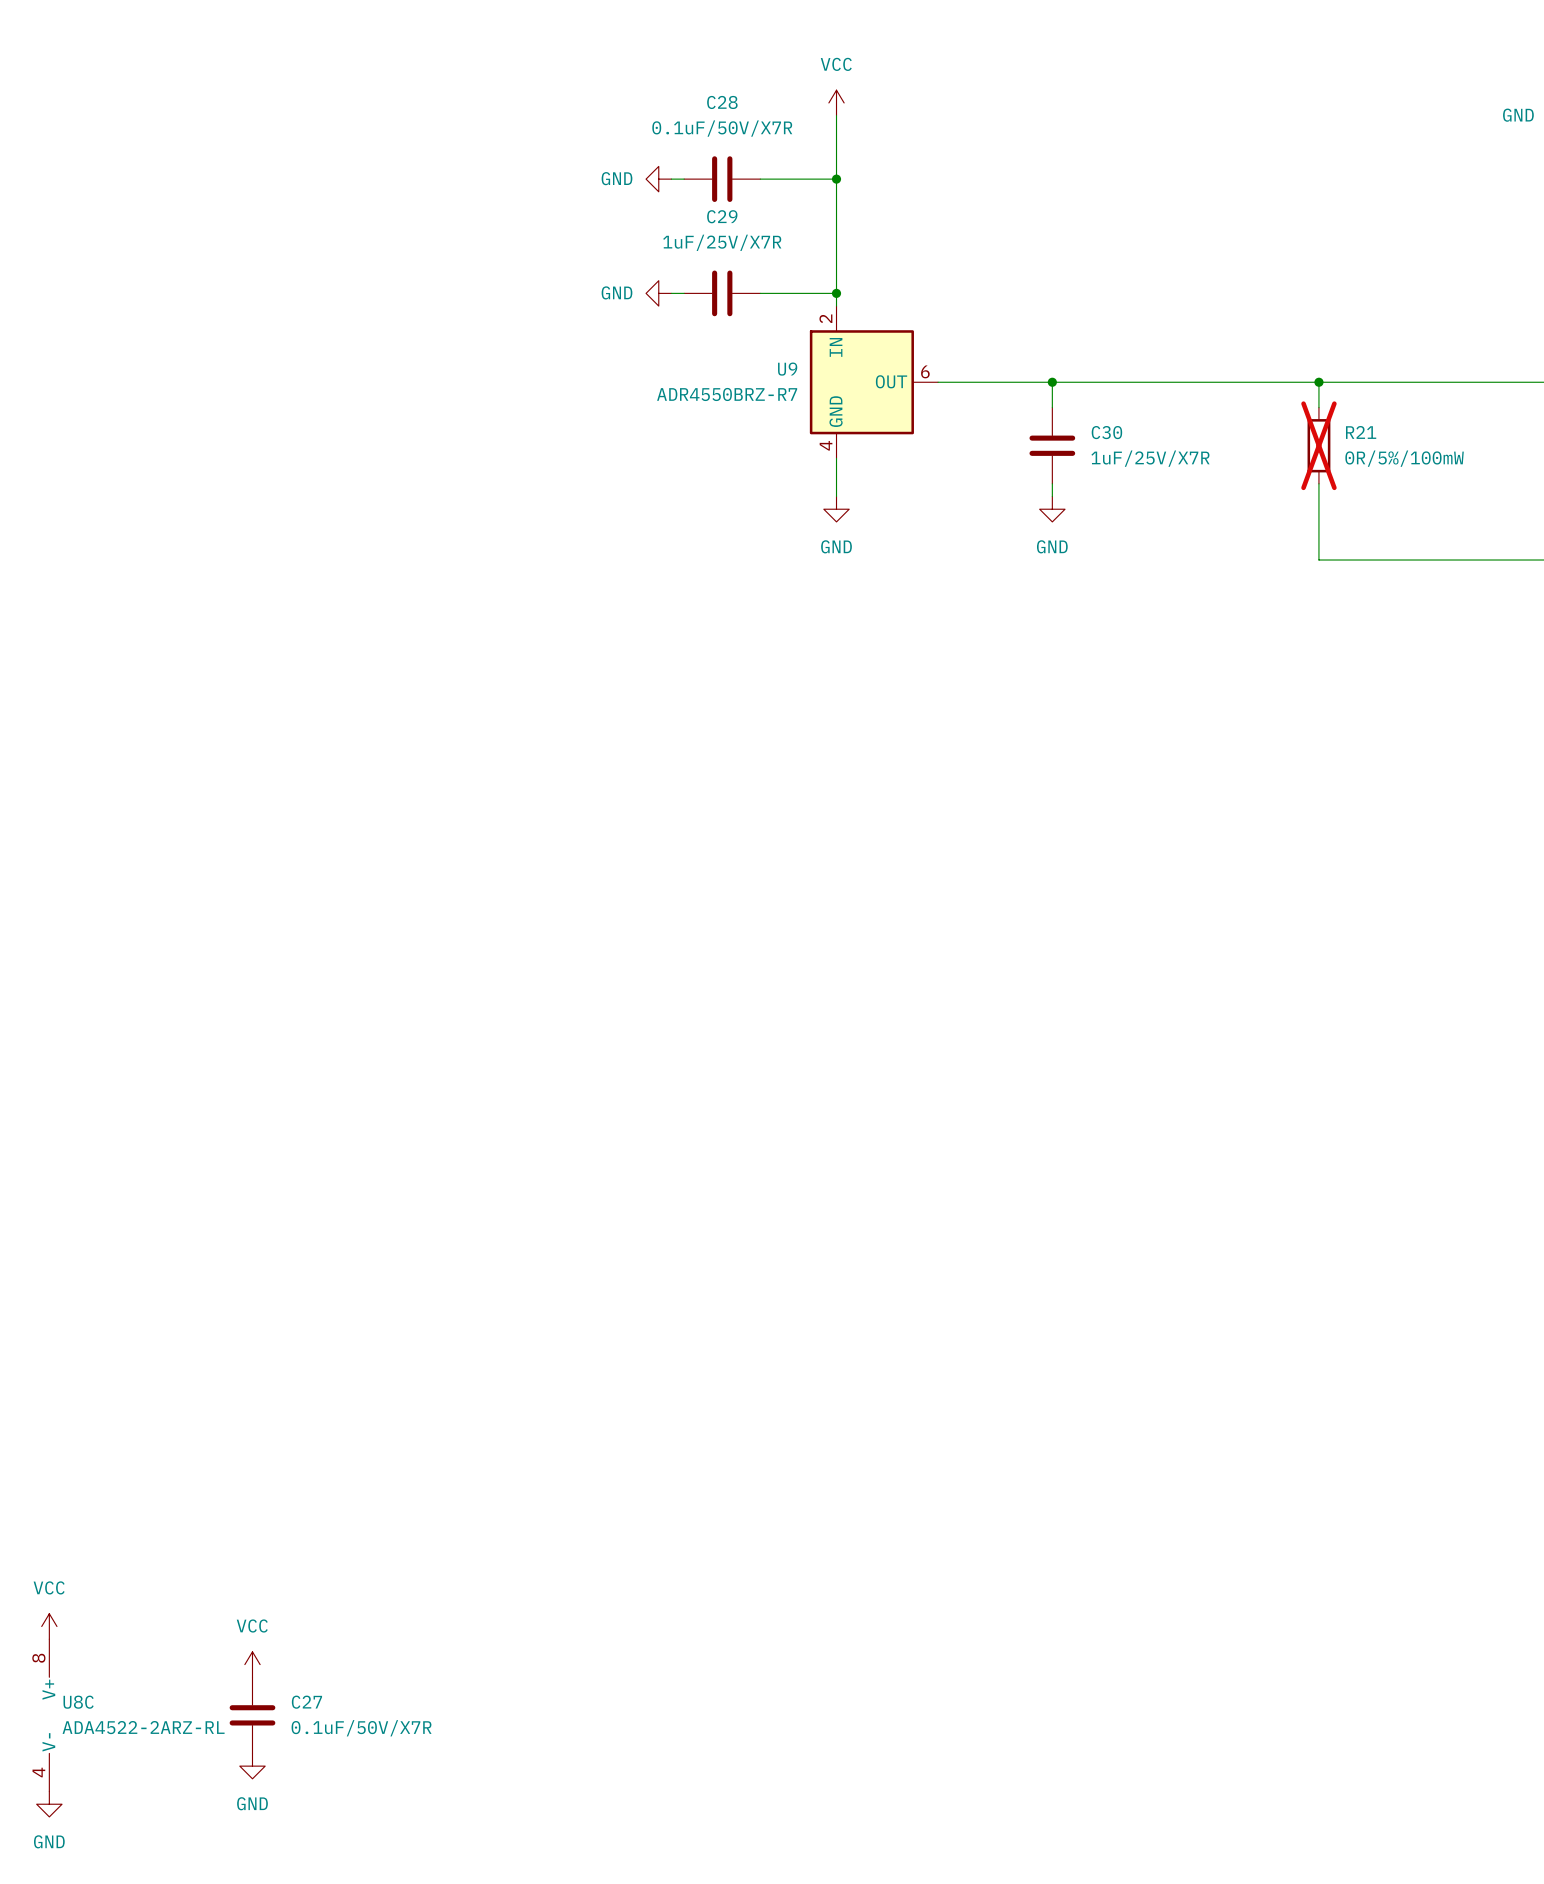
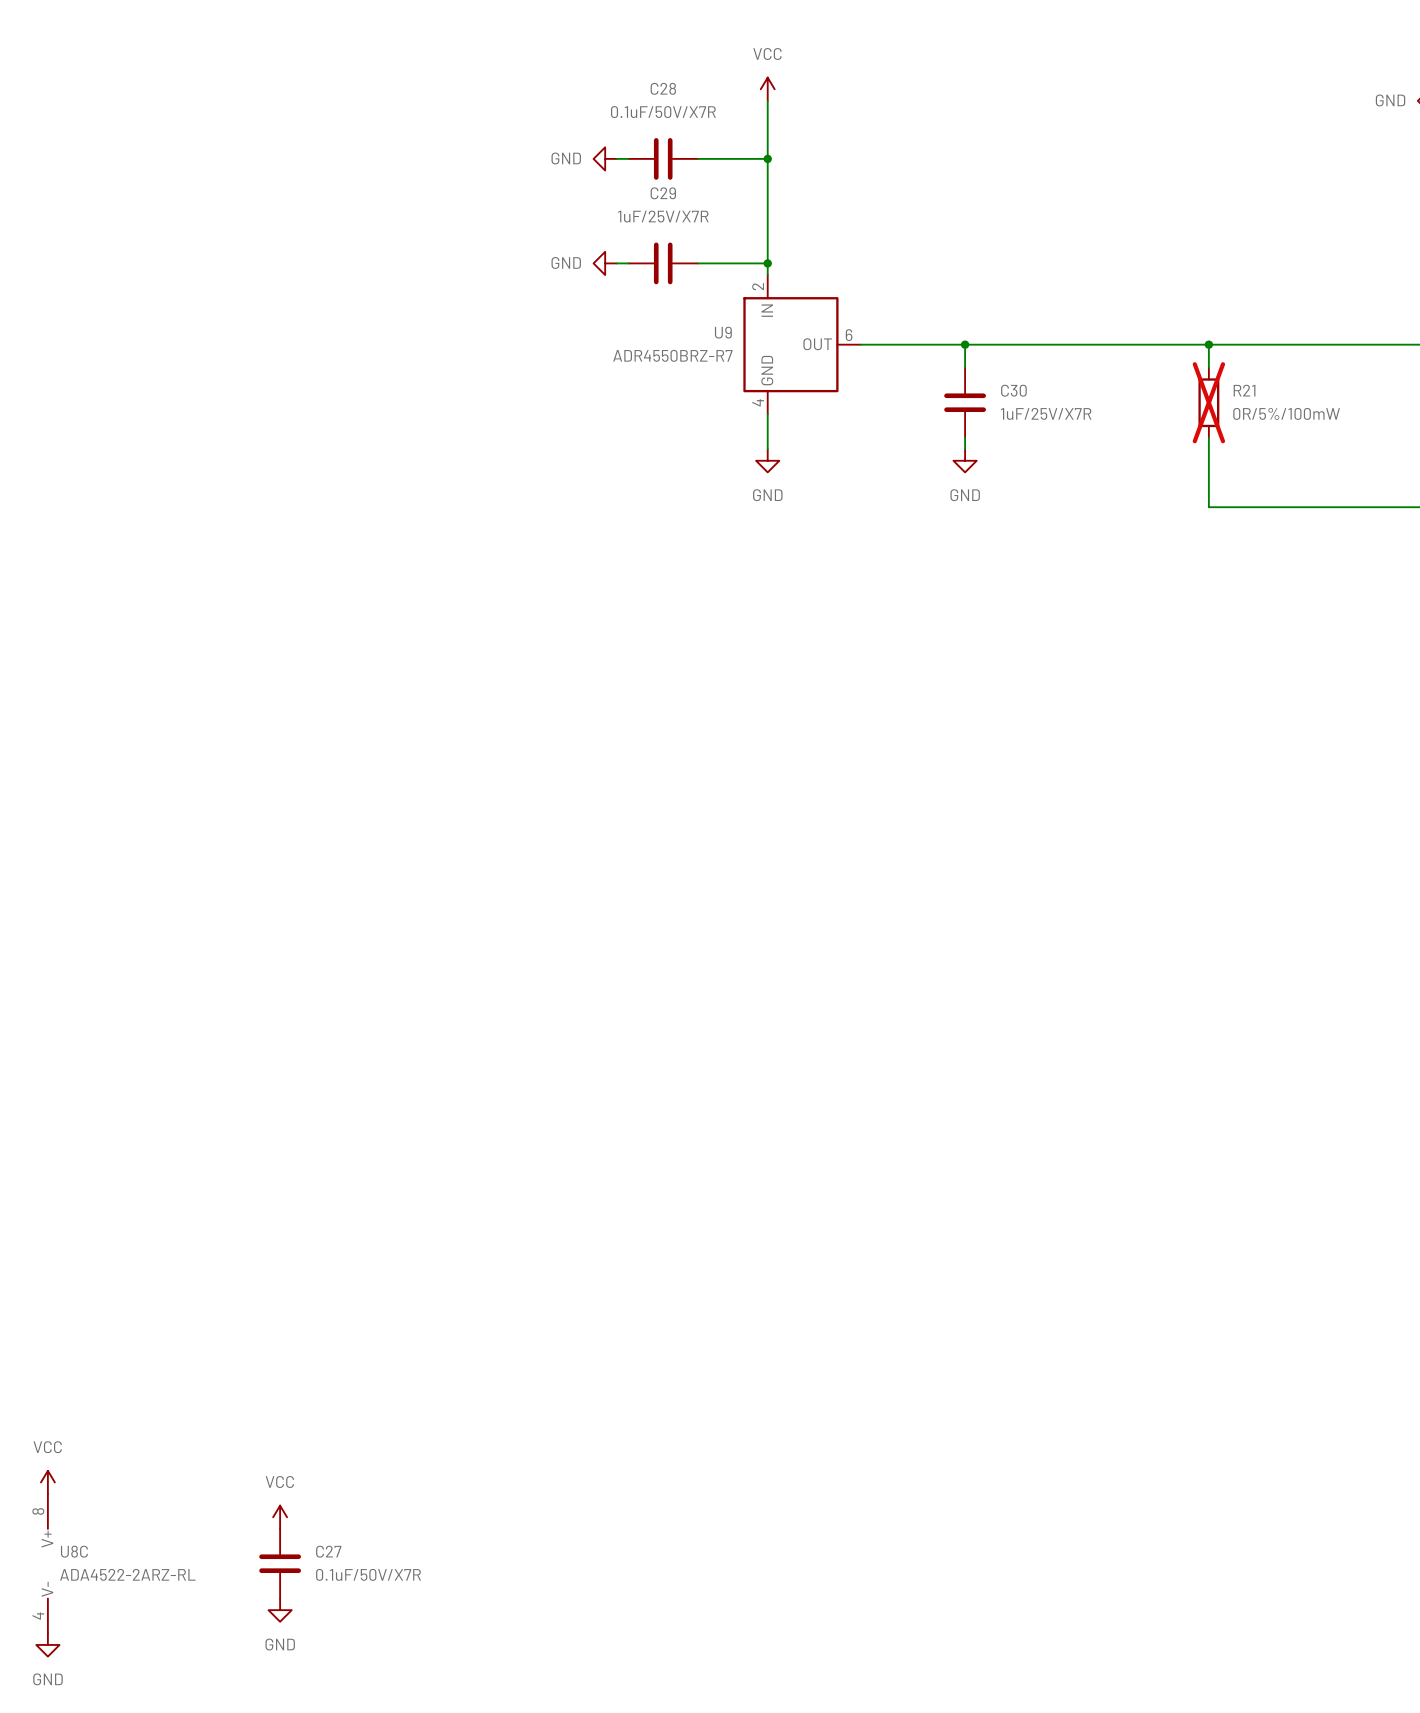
power symbol position: VCC (252, 1664) -> VCC (280, 1517)
C27 position: (252, 1715) -> (280, 1563)
power symbol position: GND (252, 1766) -> GND (280, 1610)

